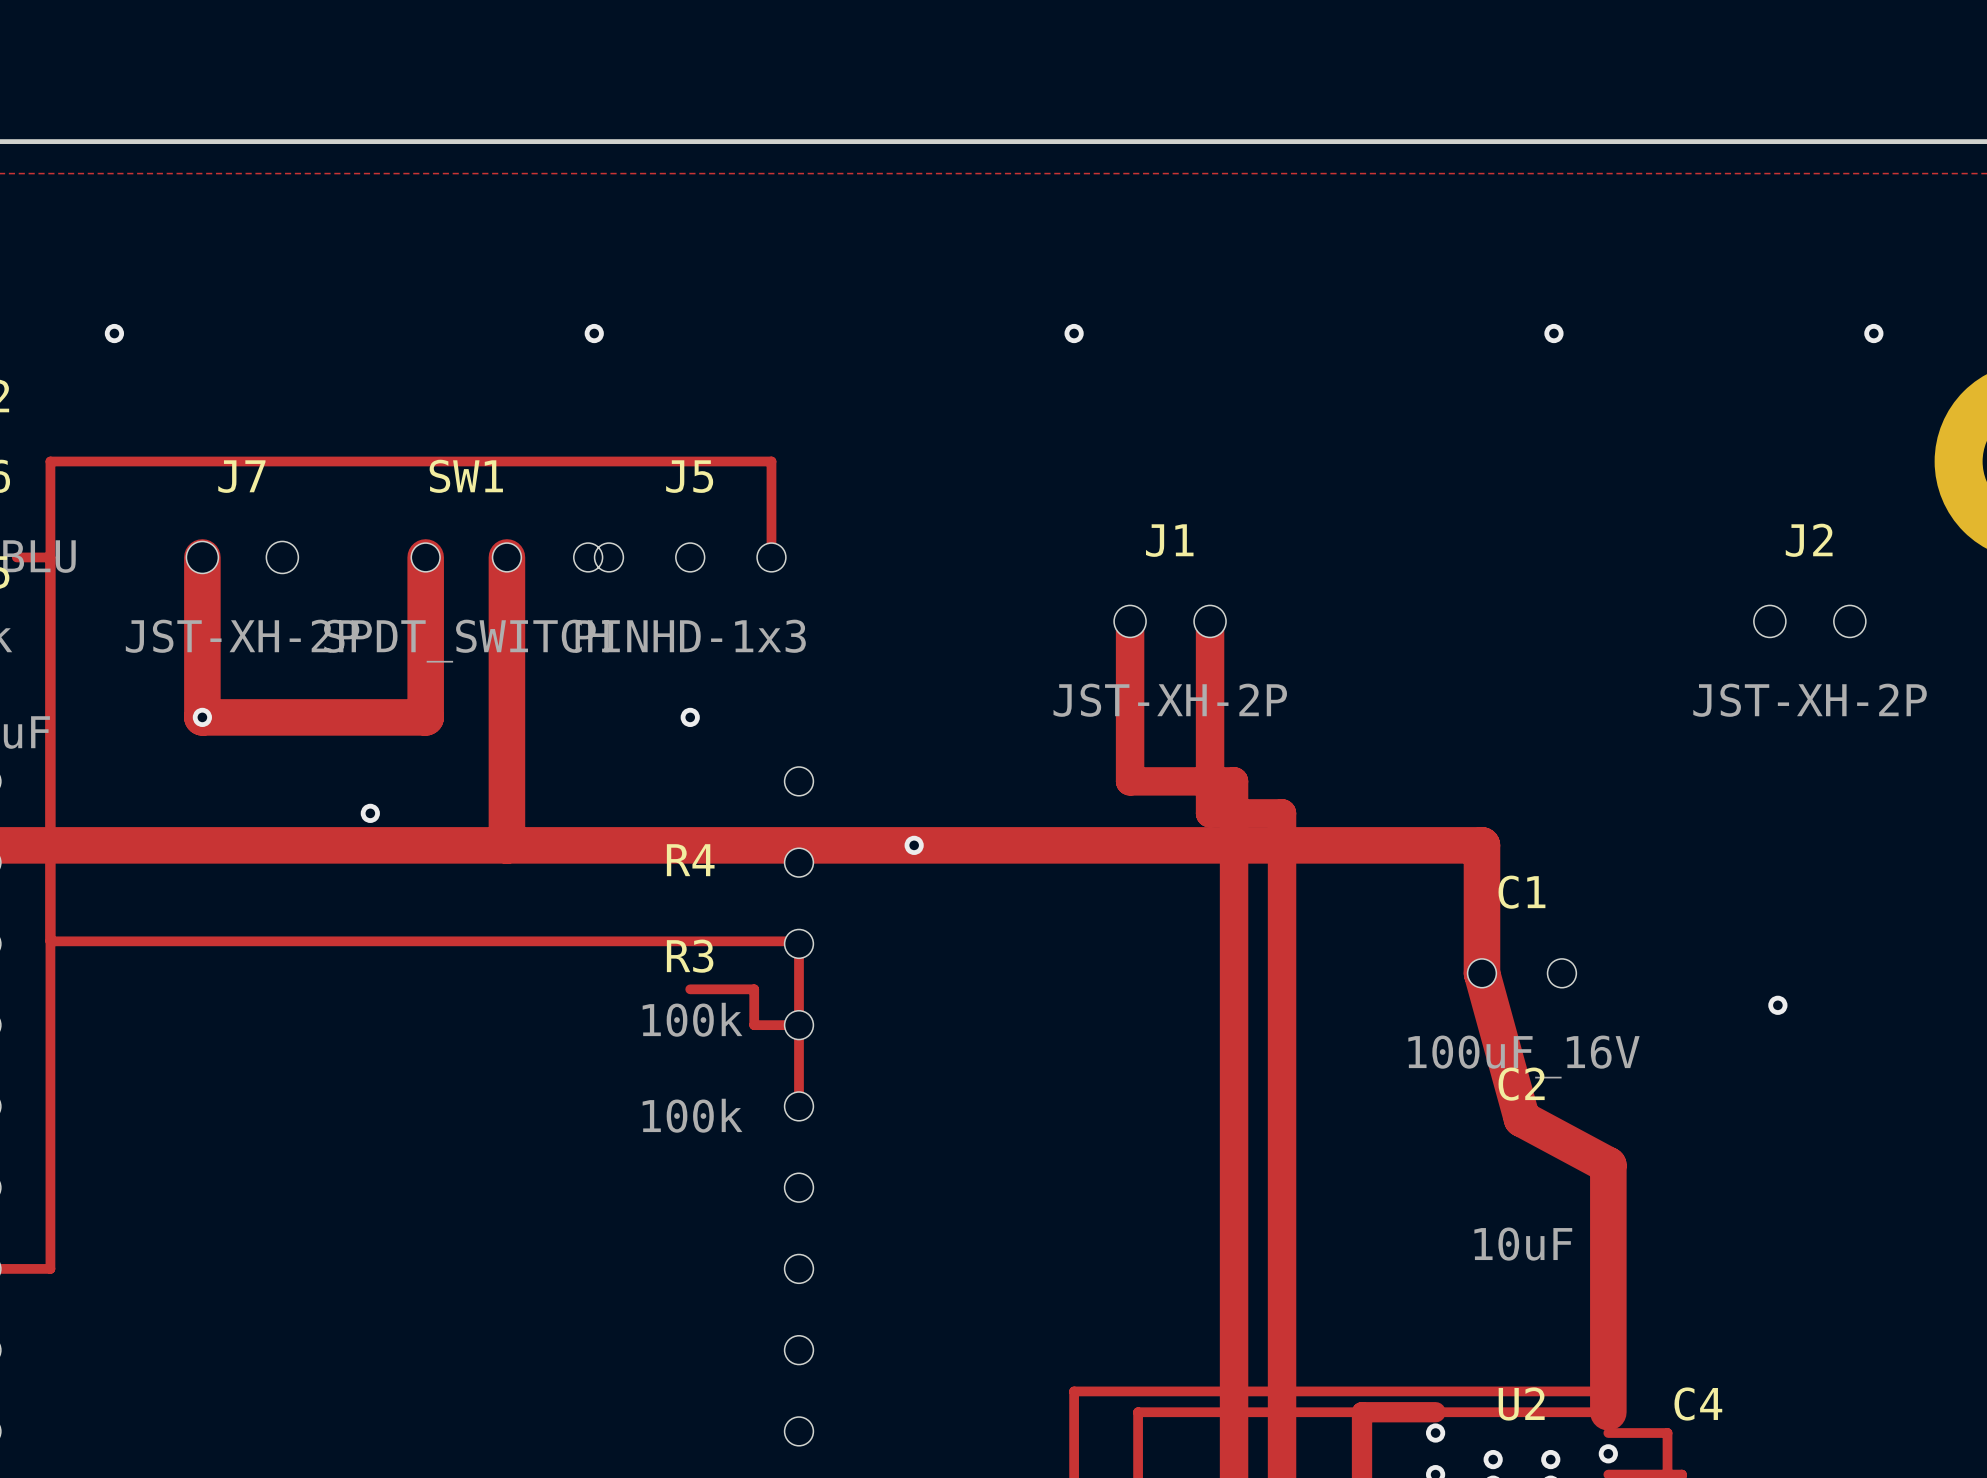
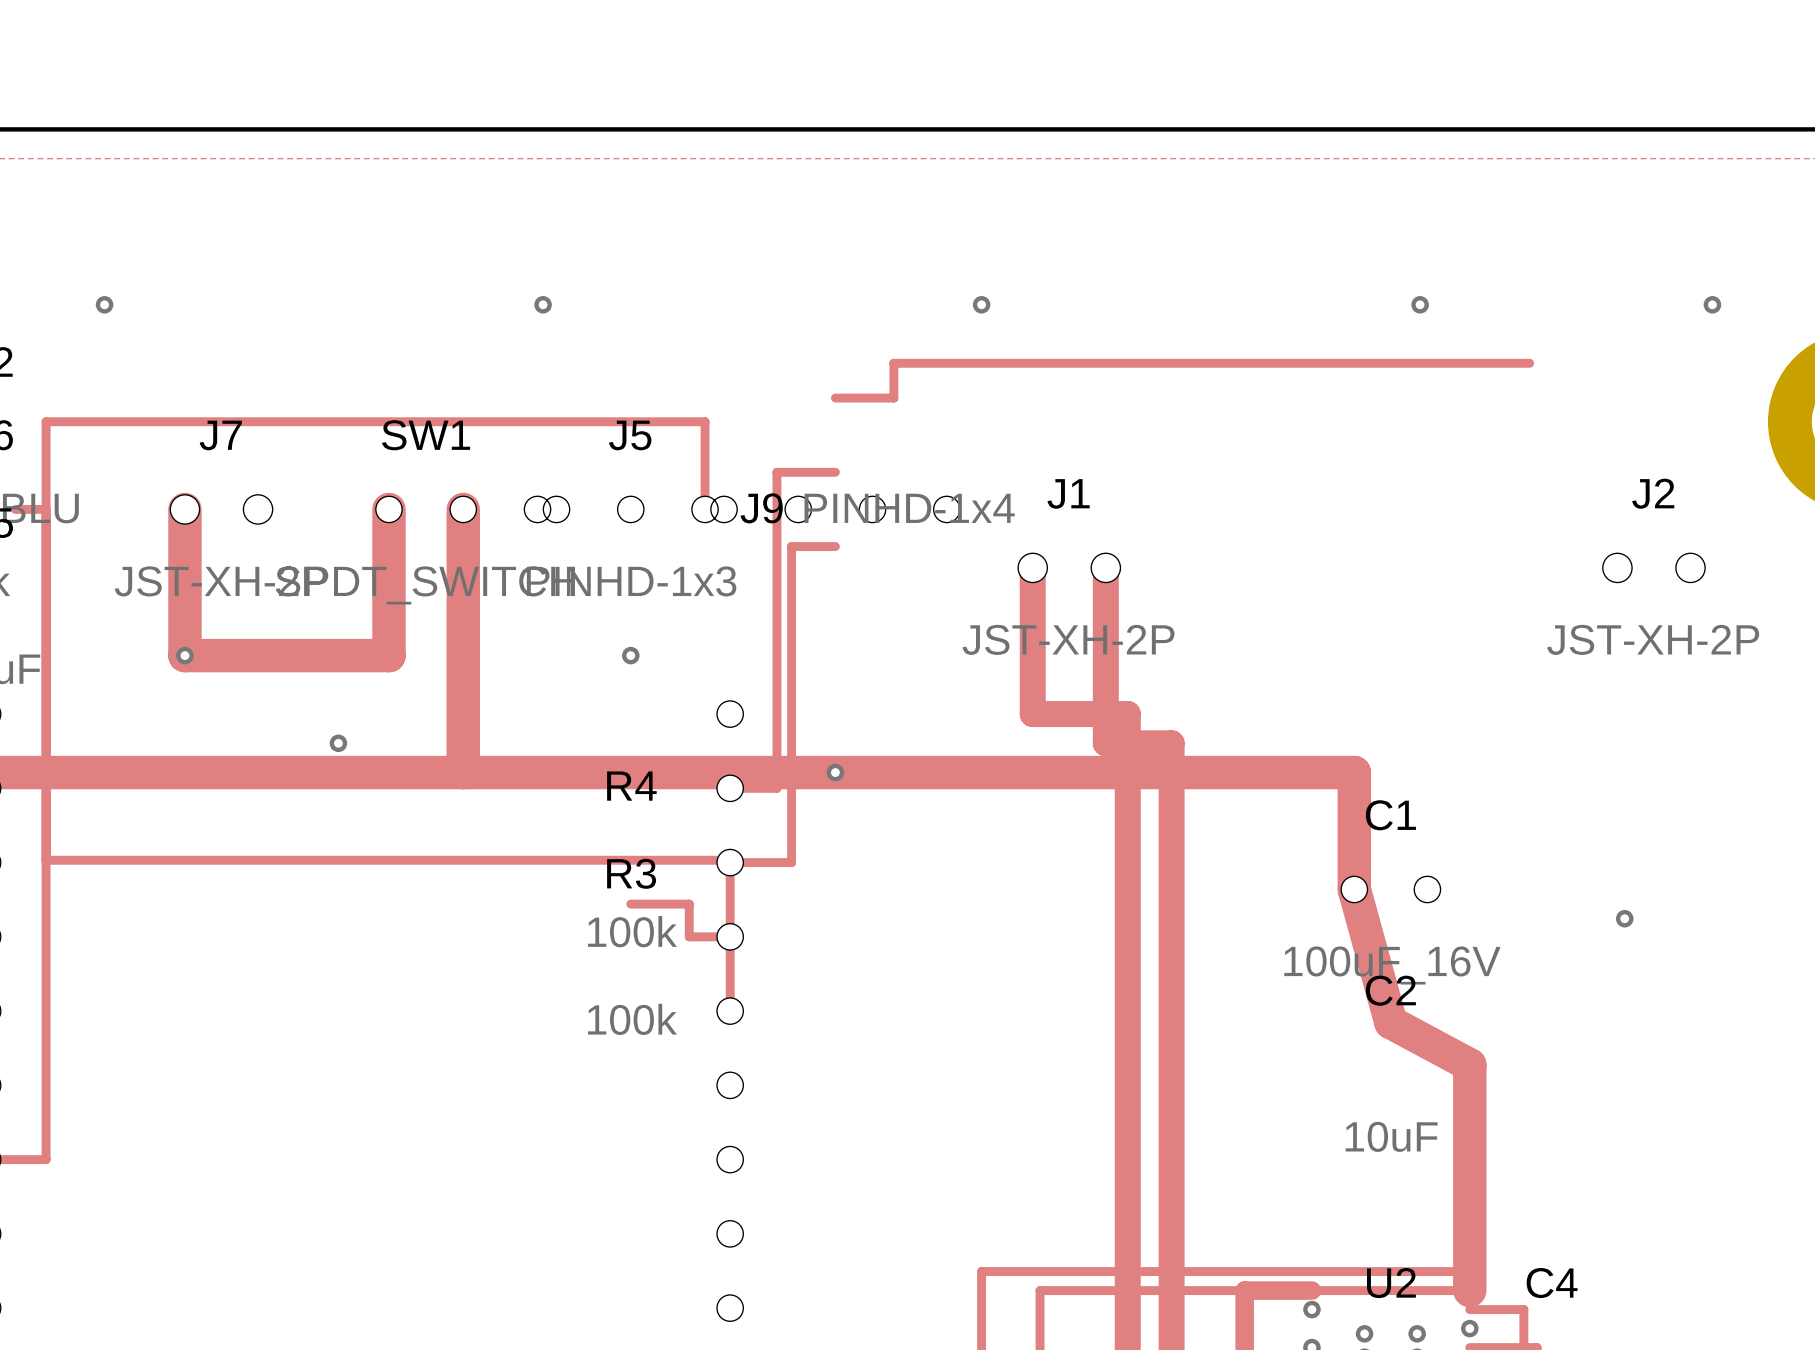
track: none -> (1529, 363) (893, 363) (893, 398) (835, 398)
track: none -> (835, 472) (776, 472) (776, 788) (730, 788)
J9: none -> PINHD-1x4 (835, 509)
track: none -> (835, 546) (791, 546) (791, 862) (730, 862)

